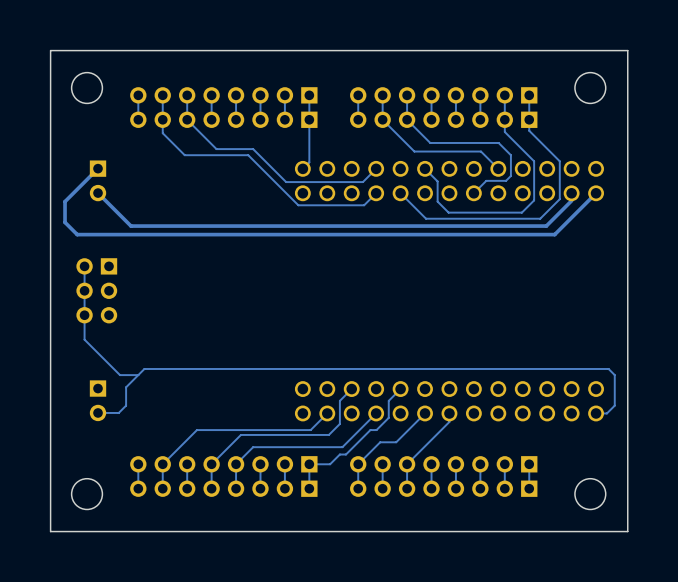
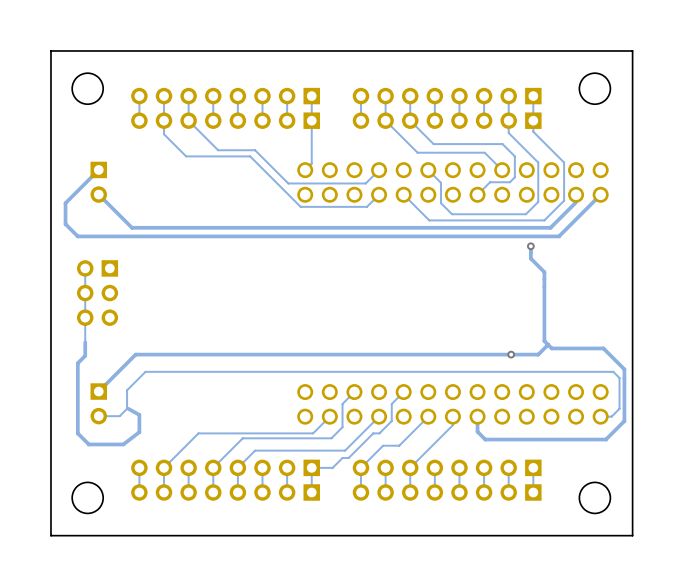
track: none -> (530, 246) (530, 258) (544, 272) (544, 341) (551, 348) (603, 348) (624, 369) (624, 421) (605, 439) (485, 439) (477, 431) (477, 416)
via: none -> (530, 246)
track: (84, 339) (120, 375) (138, 375) -> (85, 342) (85, 355) (77, 363) (77, 433) (88, 444) (123, 444) (139, 432) (139, 414) (128, 408)
track: none -> (548, 344) (538, 354) (135, 354) (98, 391)
via: none -> (511, 354)

